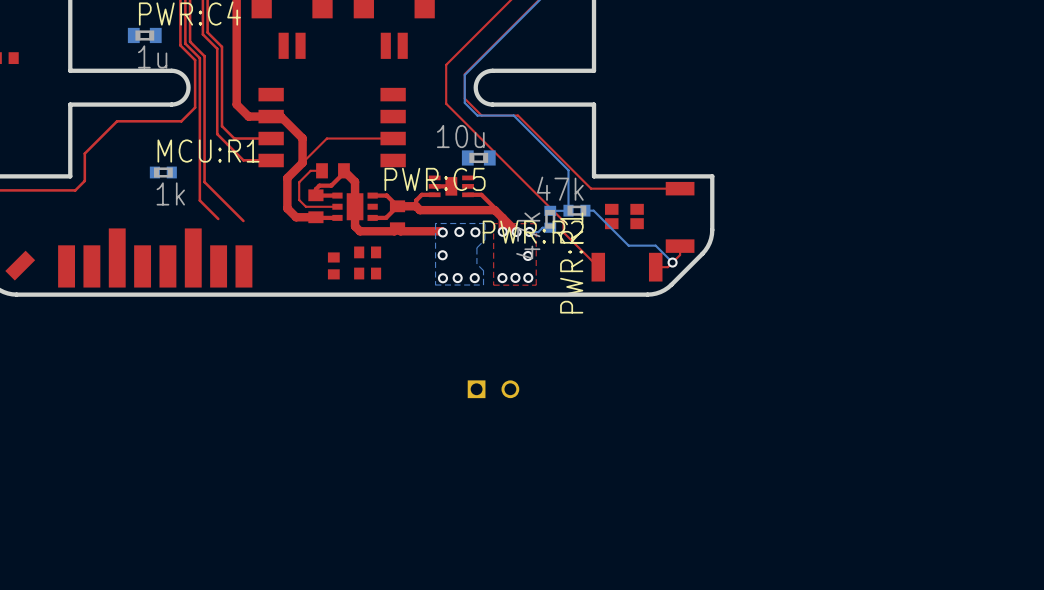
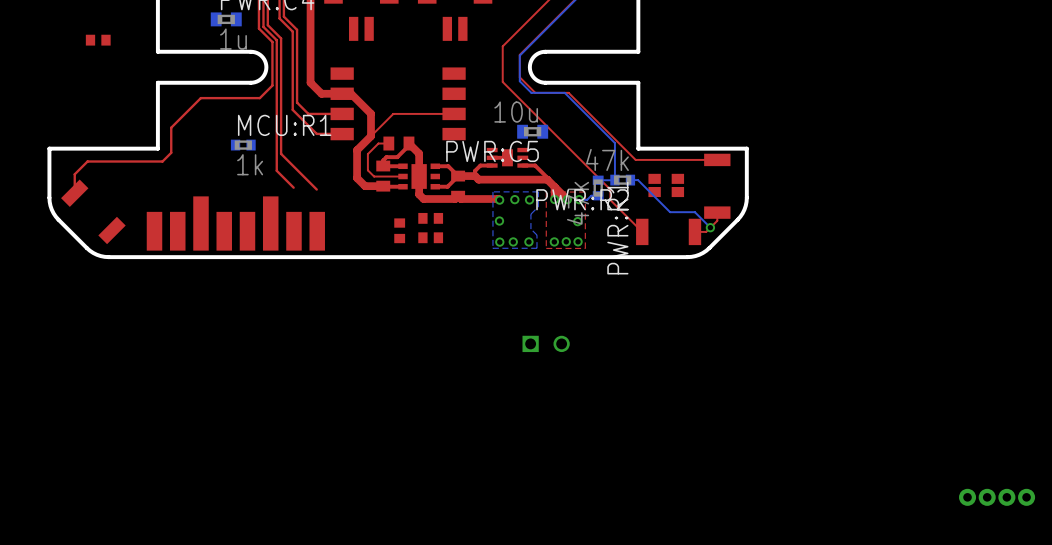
part: none -> (997, 497)

